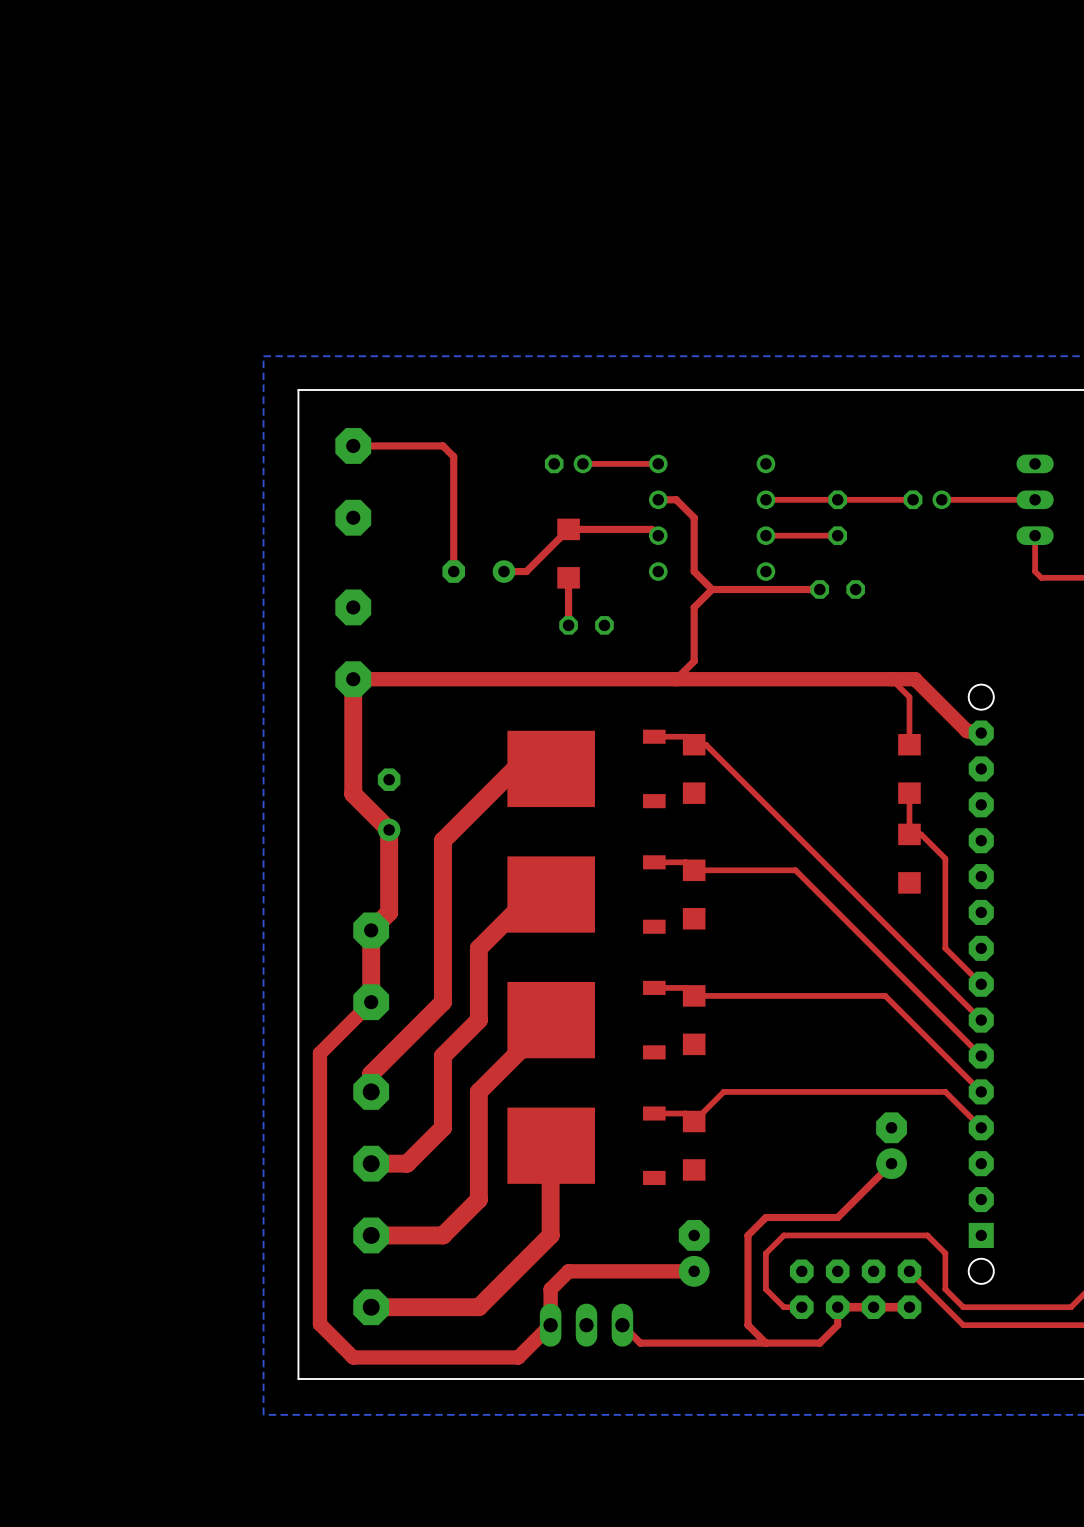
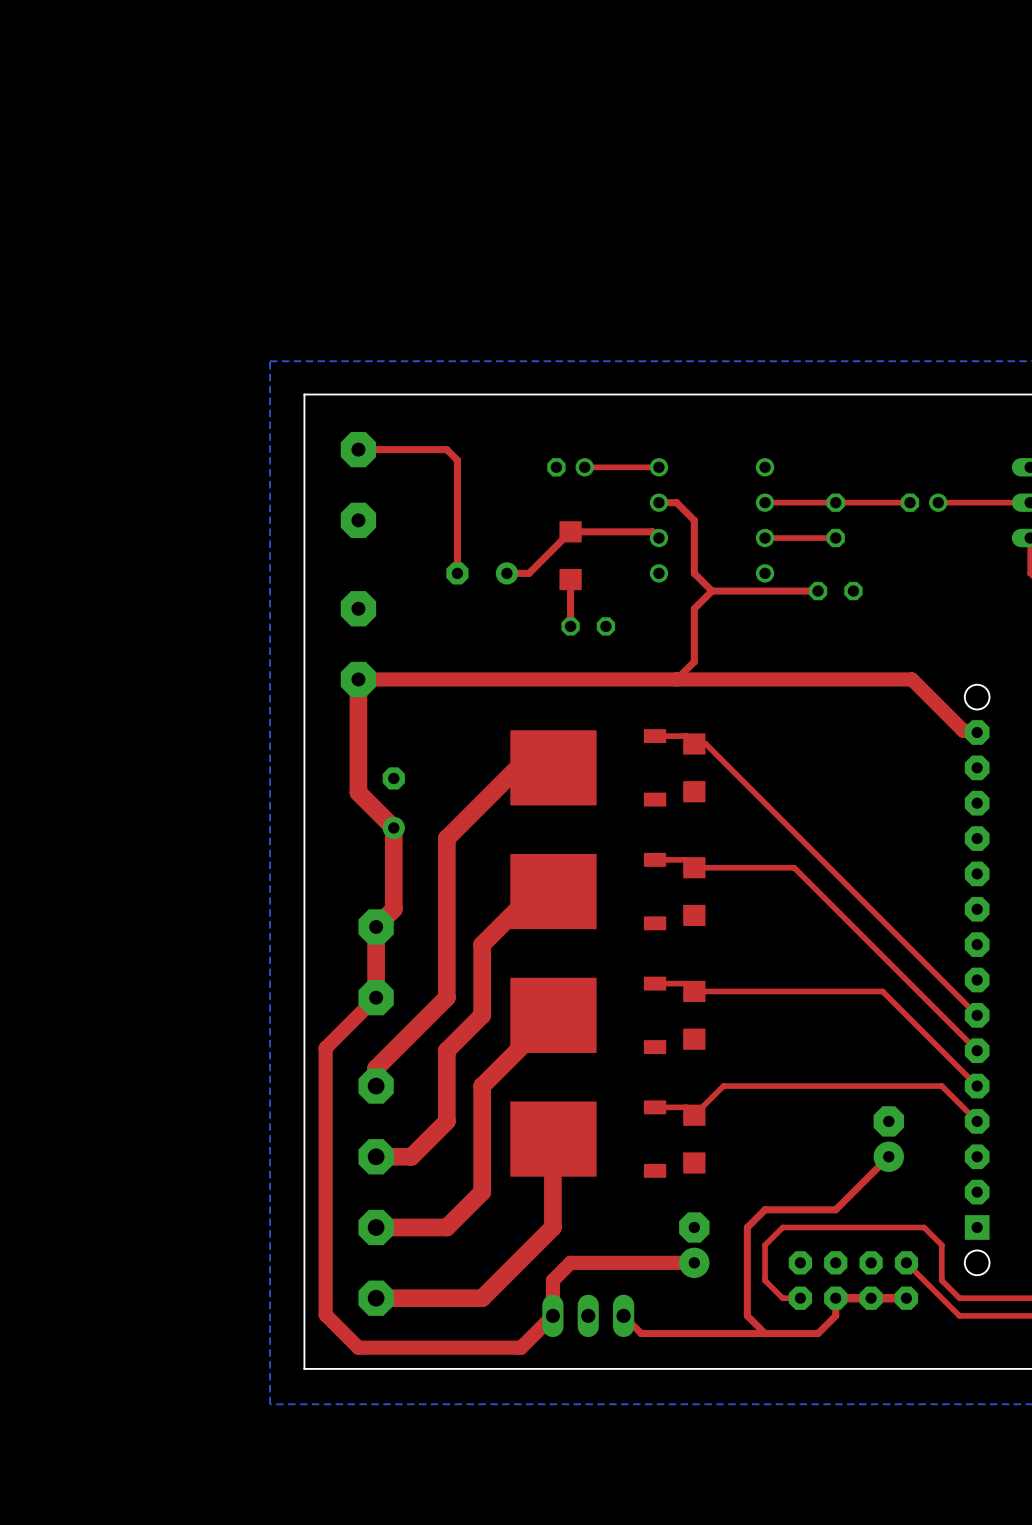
top track: (891, 679) (909, 697) (909, 744) -> none
part: (909, 768) -> none
top track: (909, 793) (909, 834) (921, 834) (945, 858) (945, 948) (981, 984) -> none
part: (909, 858) -> none

